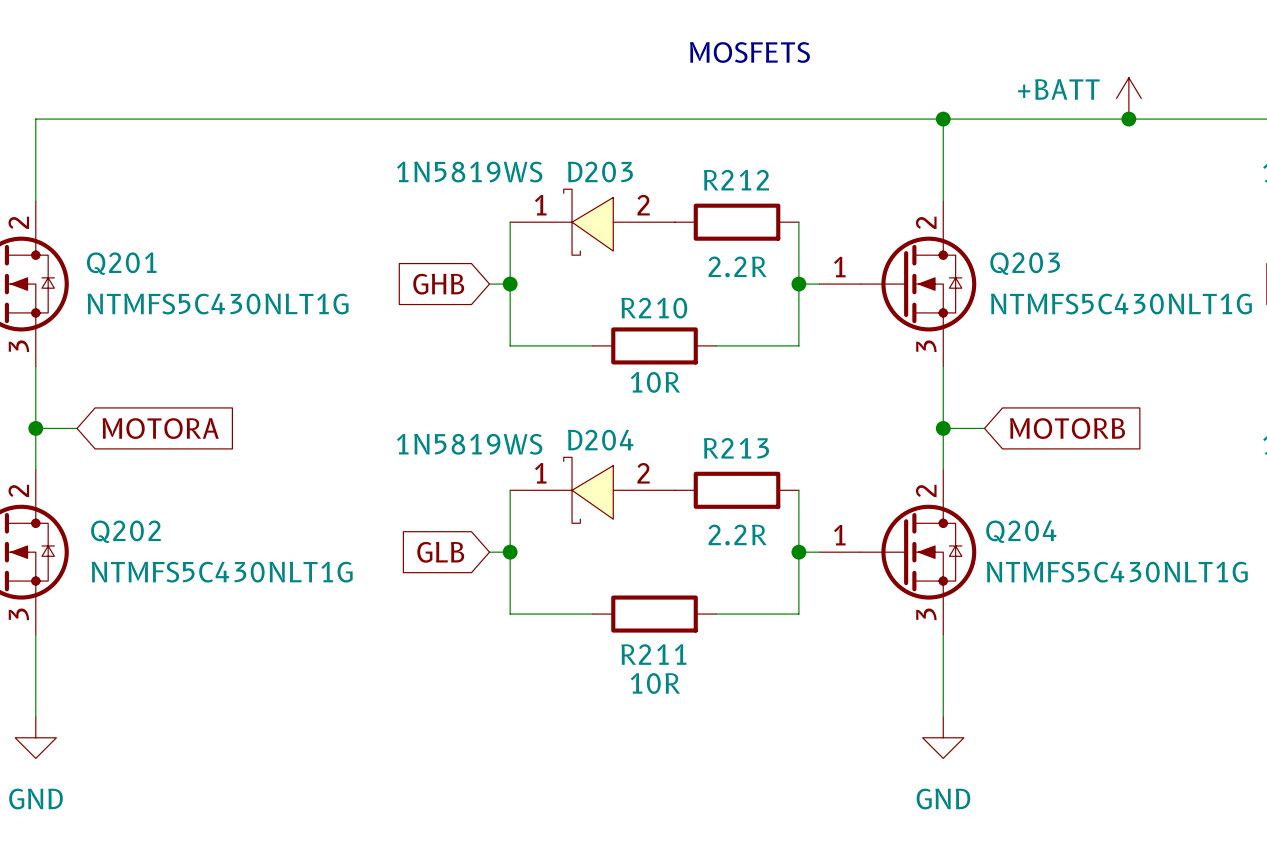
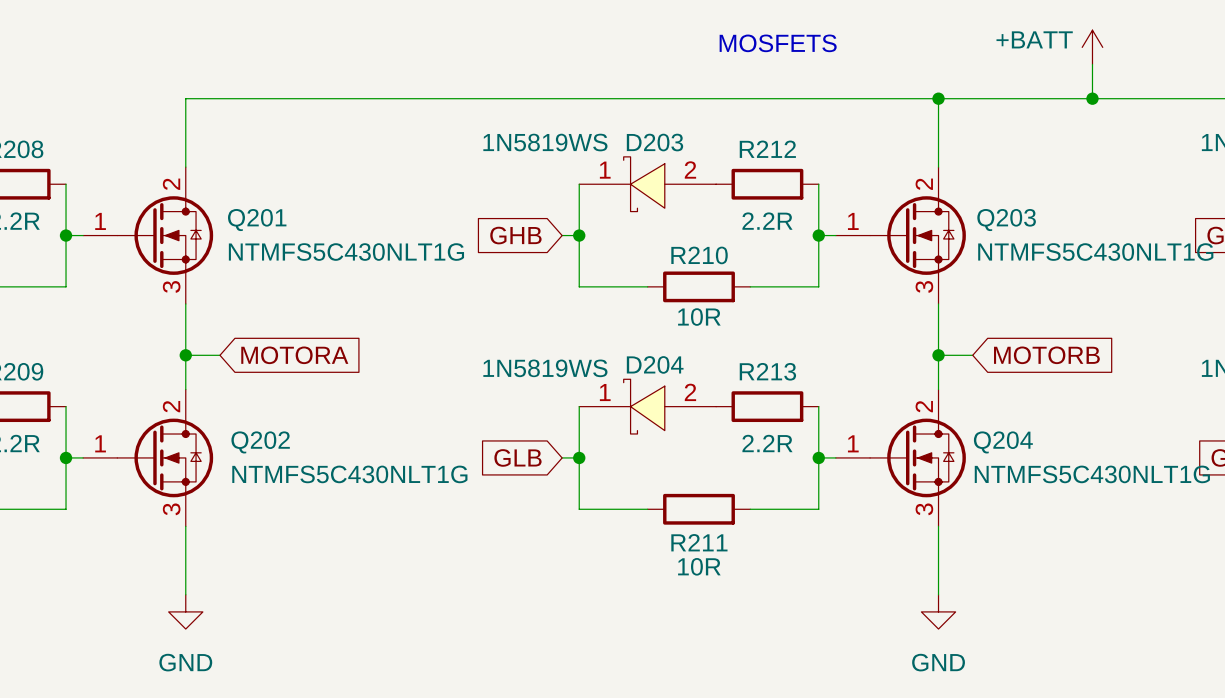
power symbol position: +BATT (1128, 98) -> +BATT (1092, 47)

